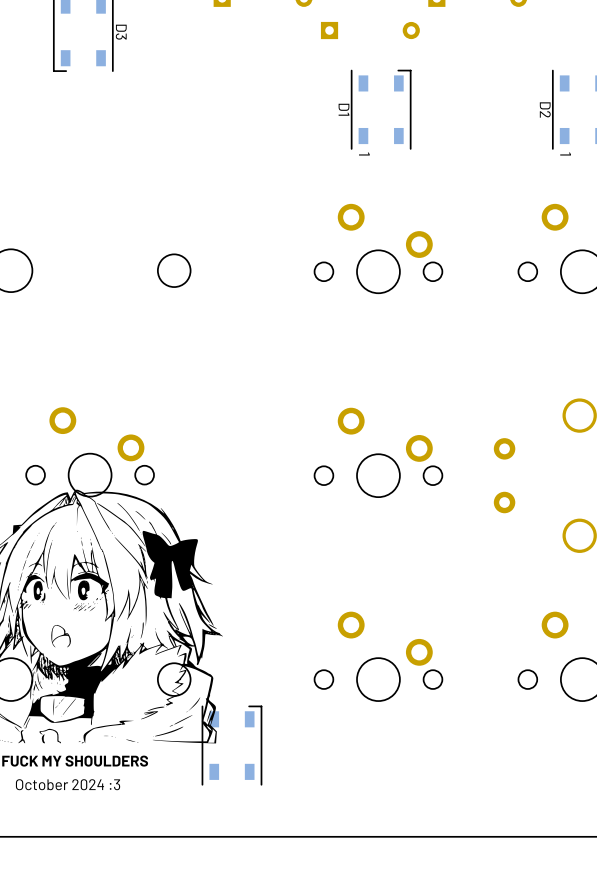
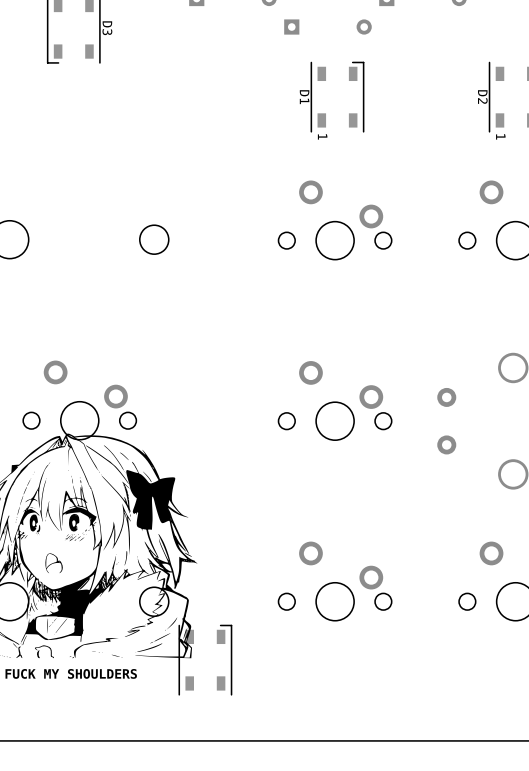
text: October 2024 :3 (68, 784) -> none

